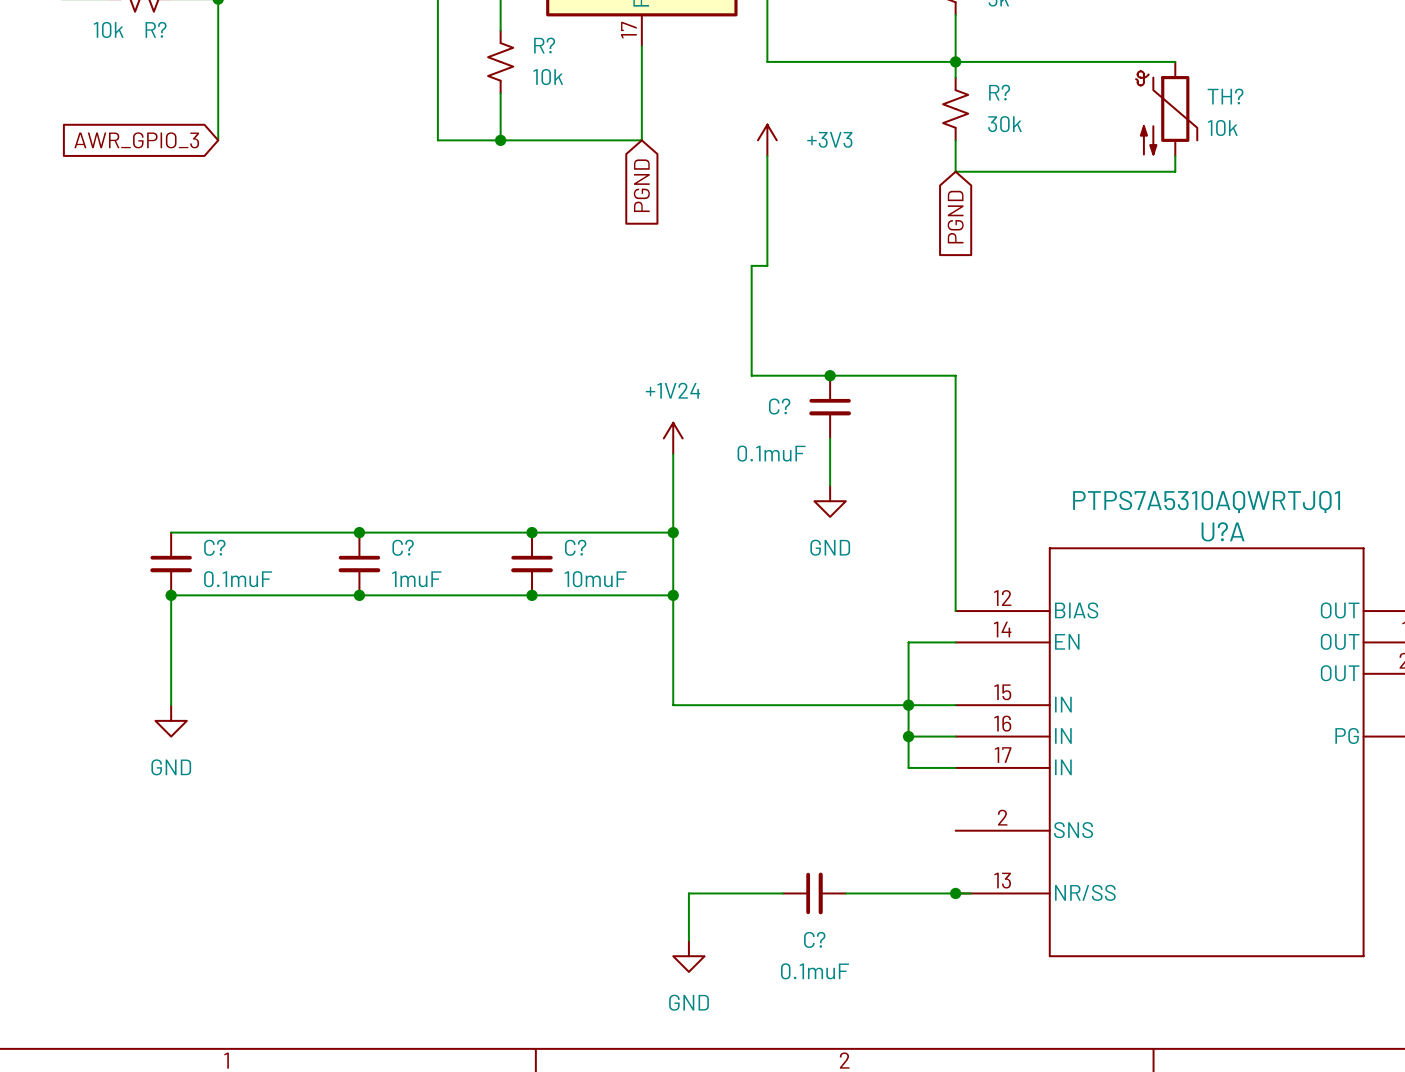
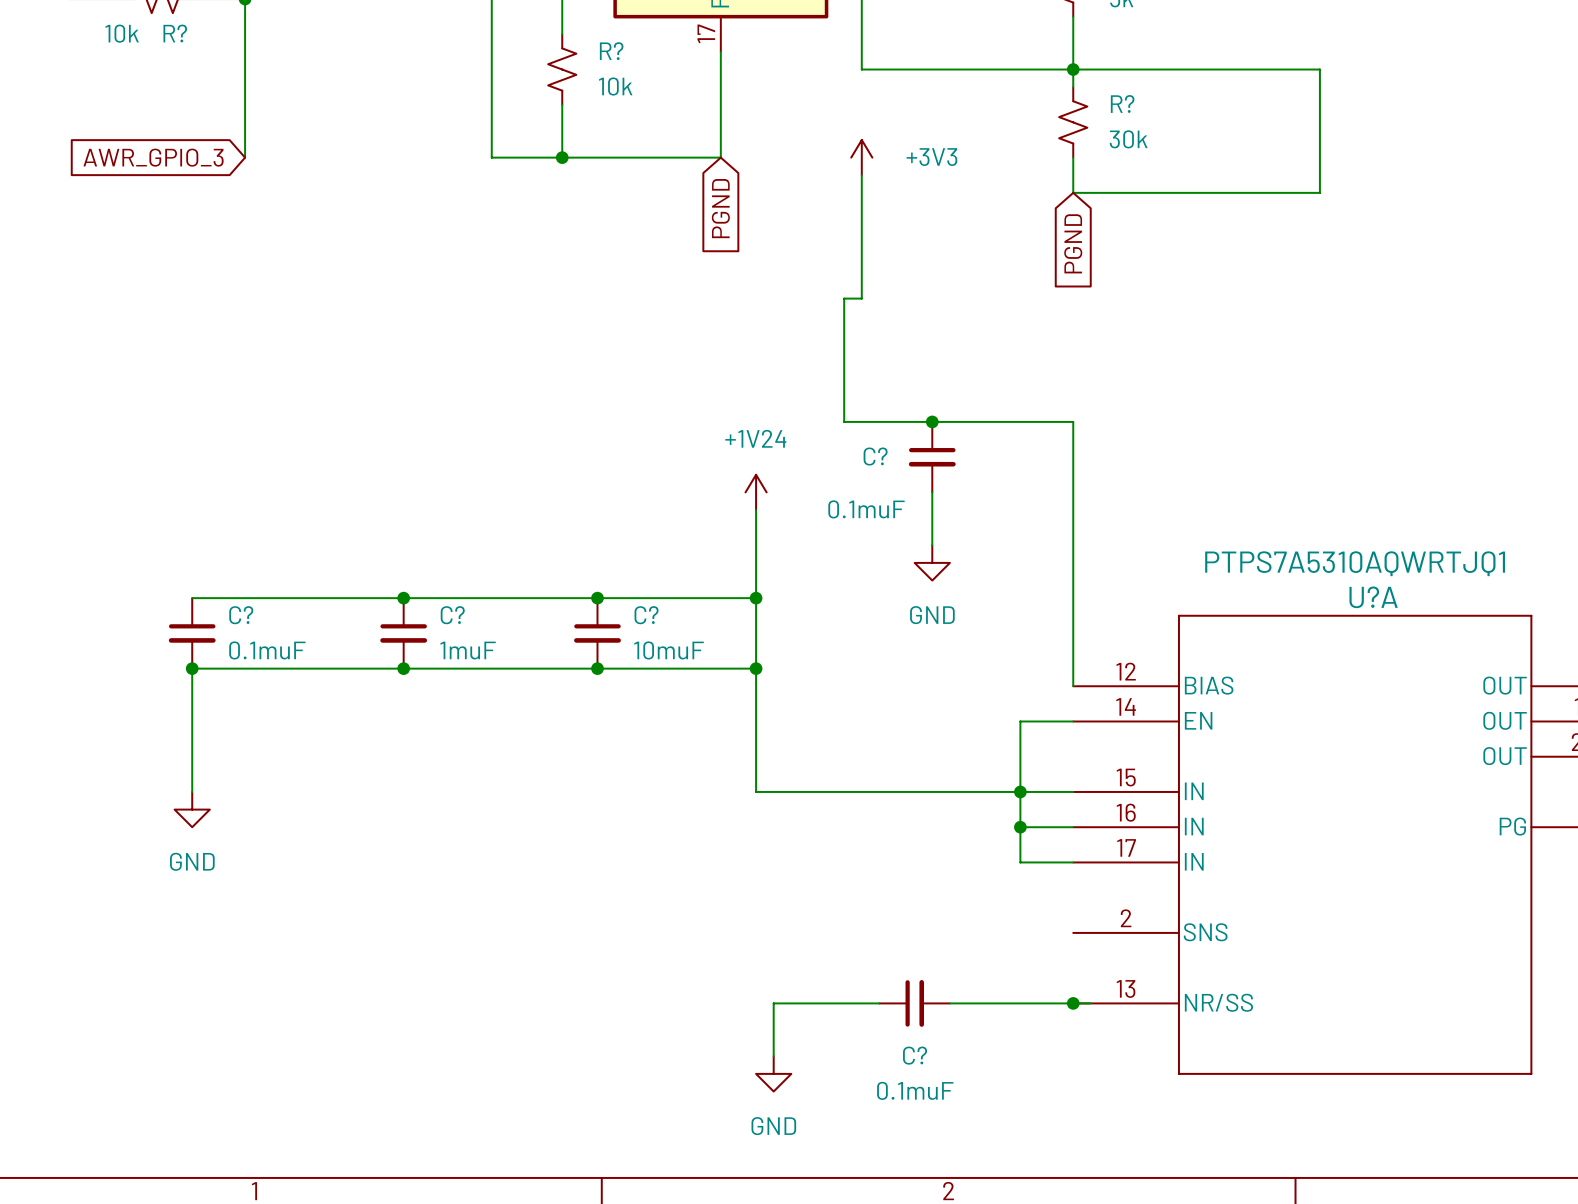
wire: none -> (1319, 69) (1319, 175)
TH?: 10k (1166, 108) -> none

